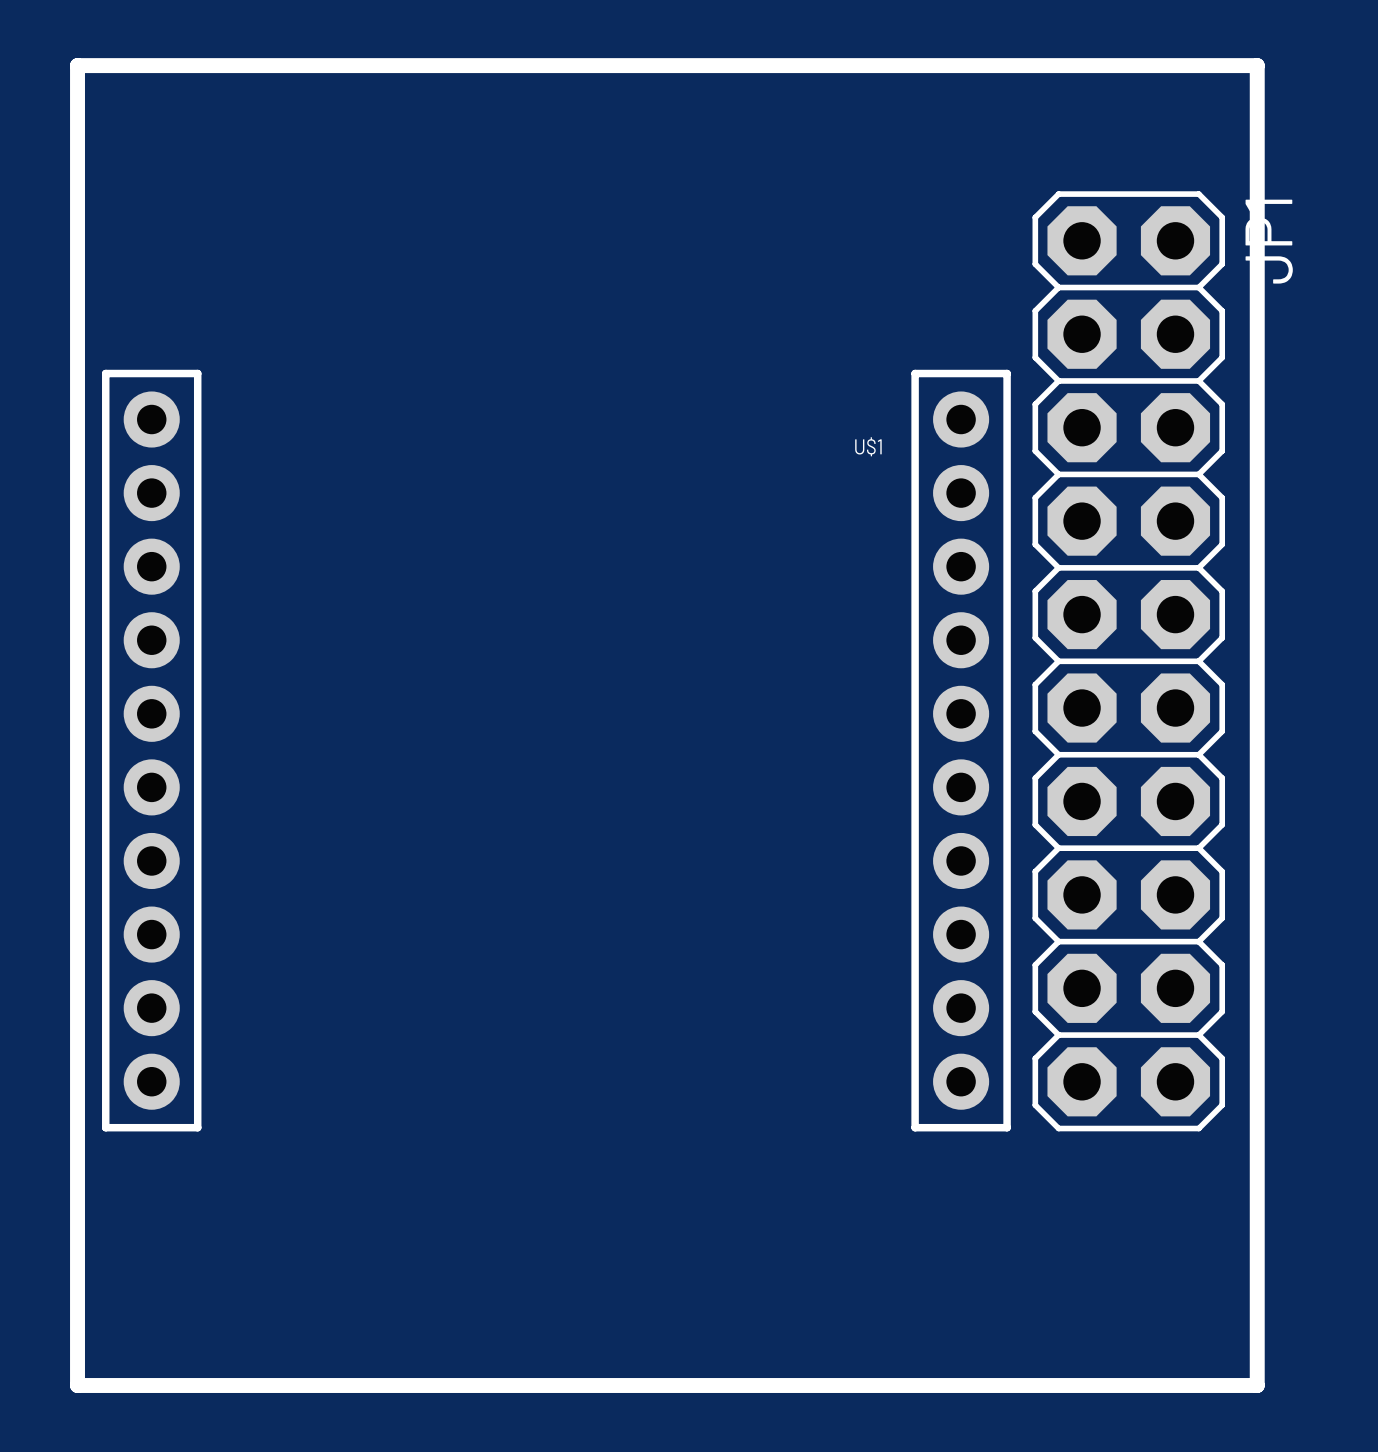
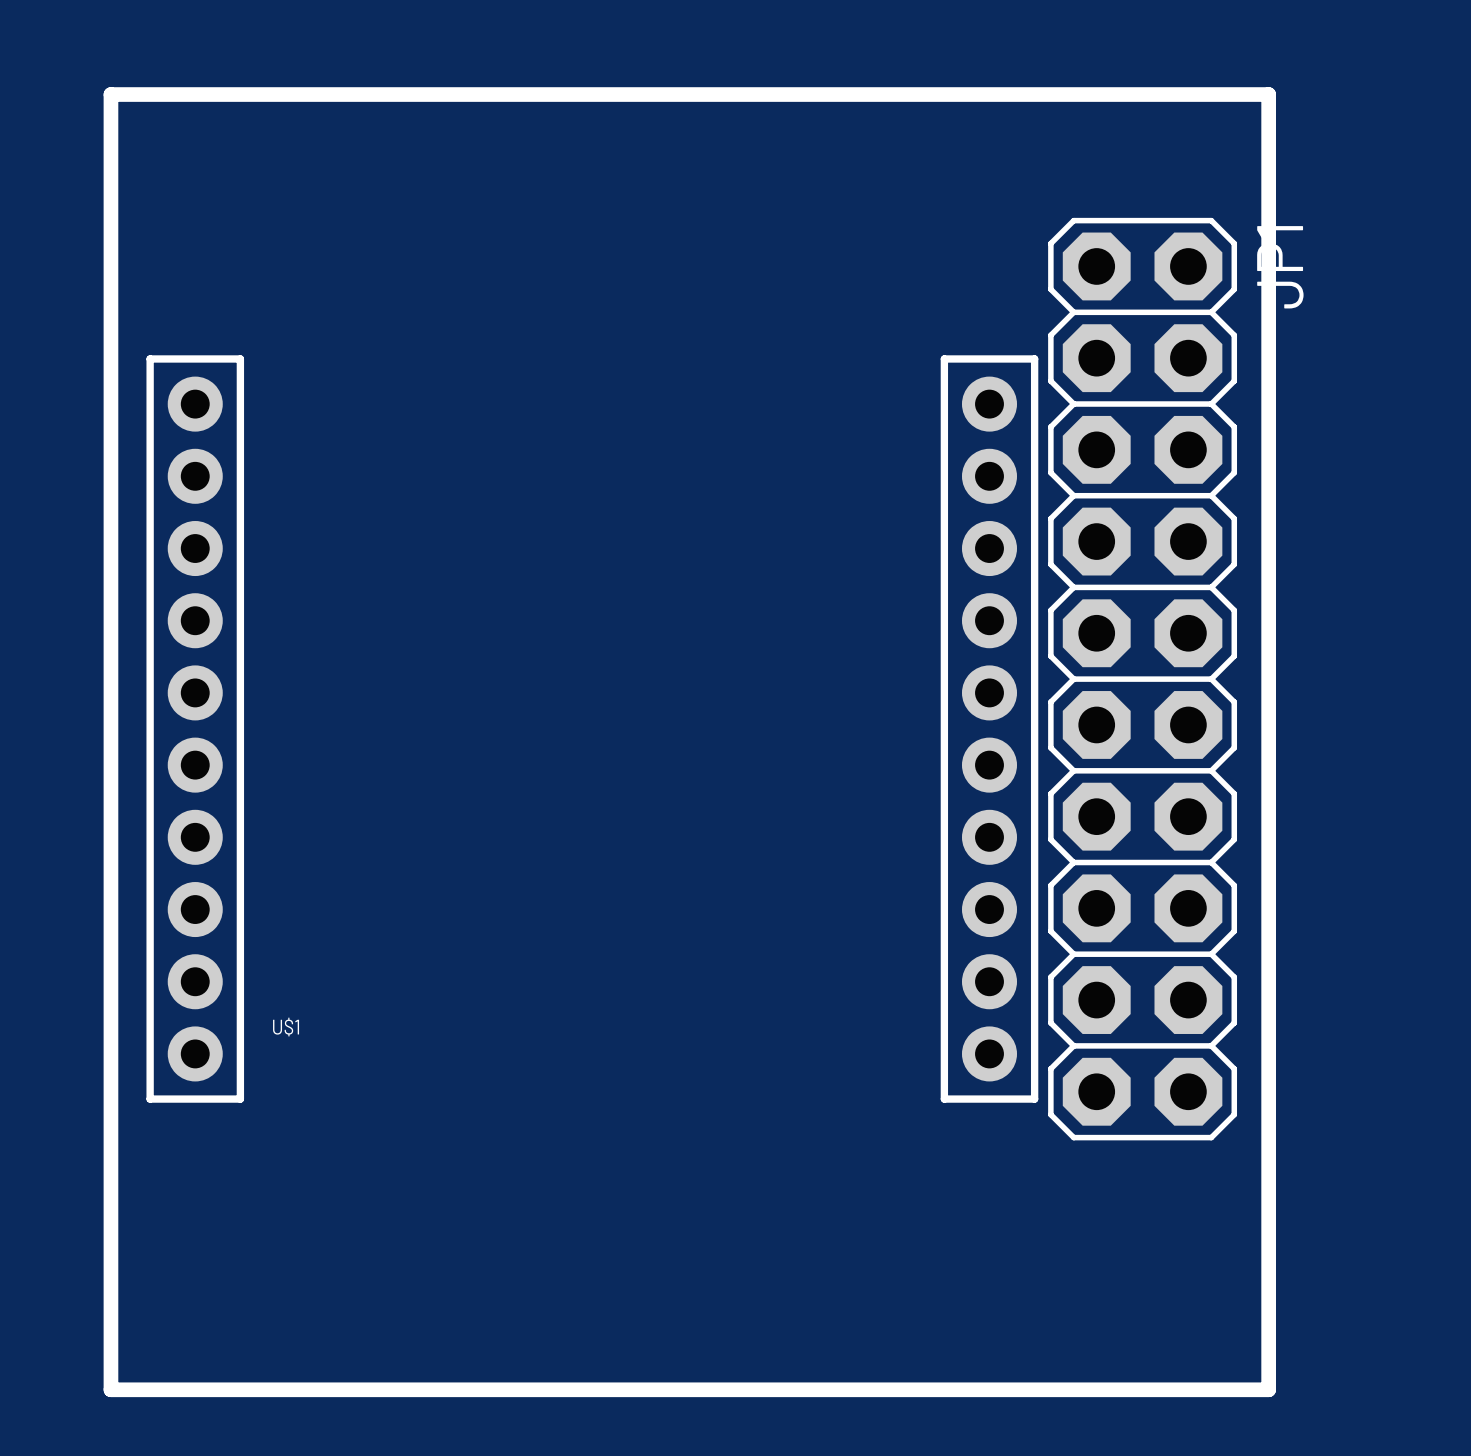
U$1 name position: U$1 (868, 446) -> U$1 (286, 1027)
U$1 position: (556, 750) -> (592, 729)

